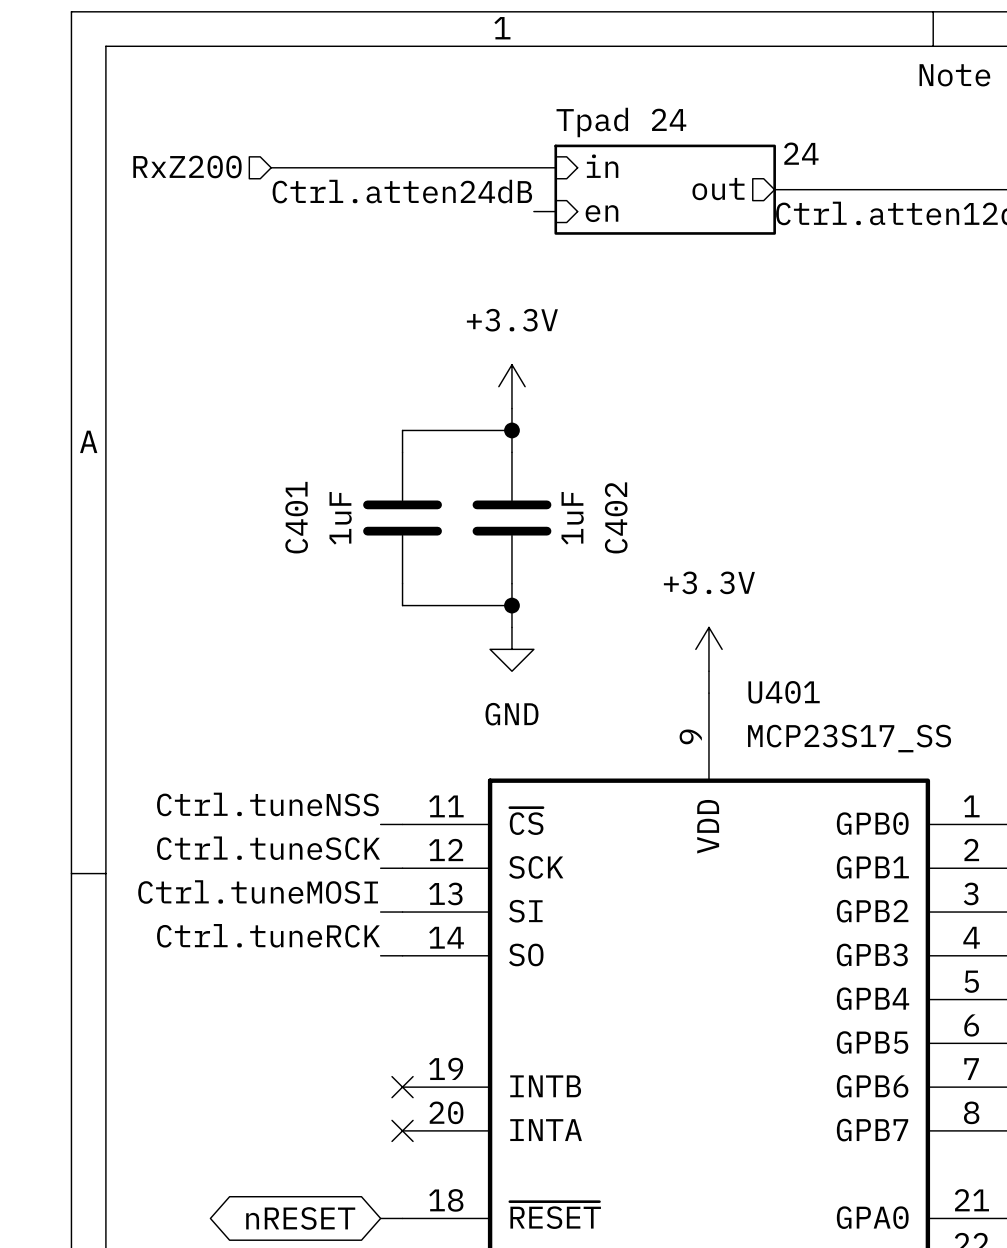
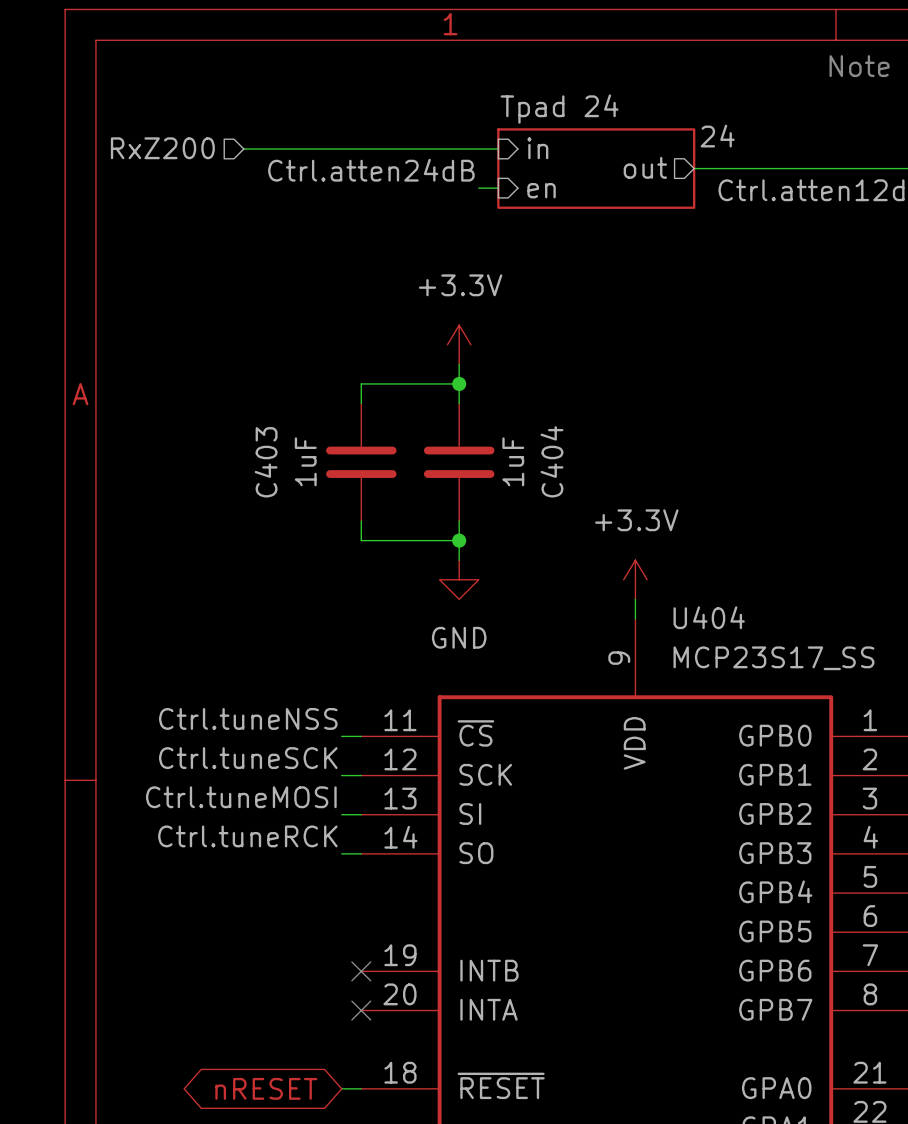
C401 name: C401 (296, 517) -> C403 (266, 462)
C402 name: C402 (616, 517) -> C404 (551, 461)
U401 name: U401 (784, 692) -> U404 (709, 617)

